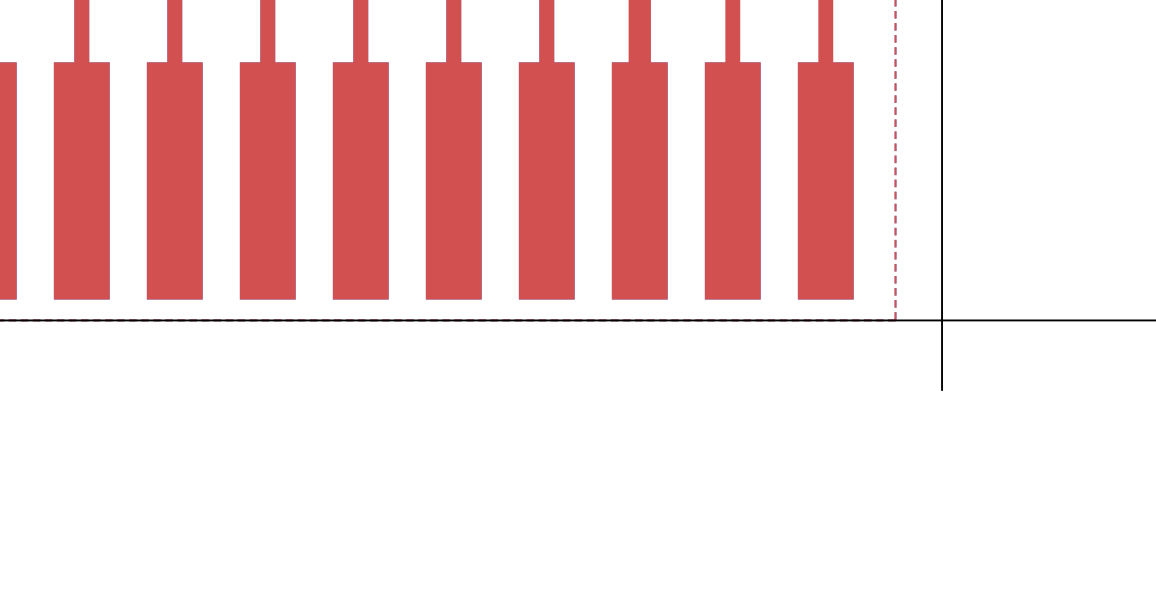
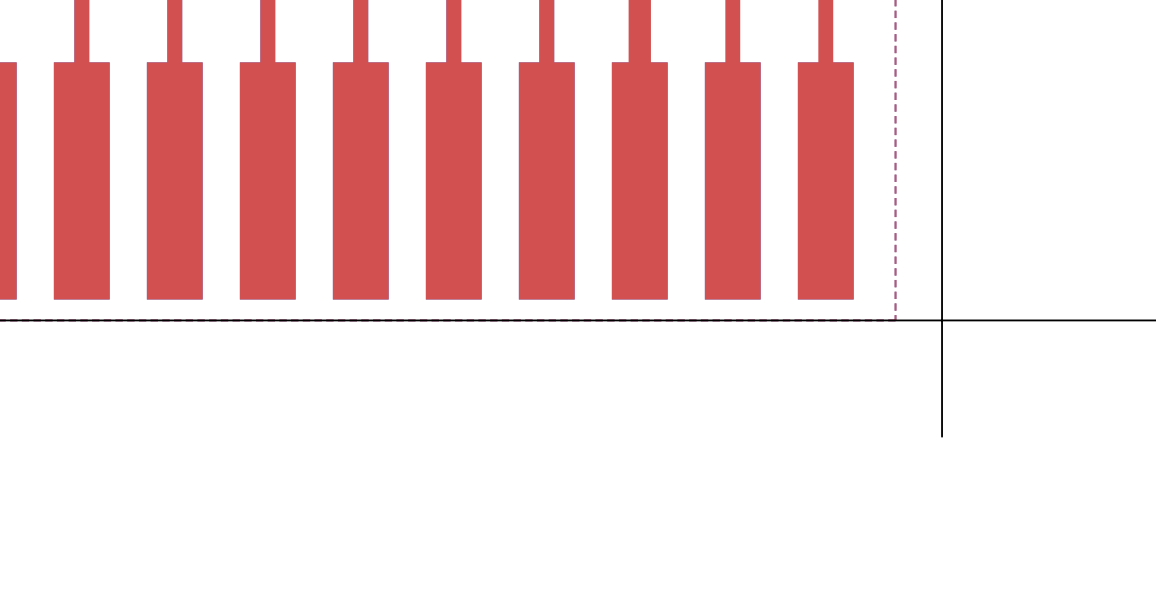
board edge: none -> (942, 390) (942, 436)

